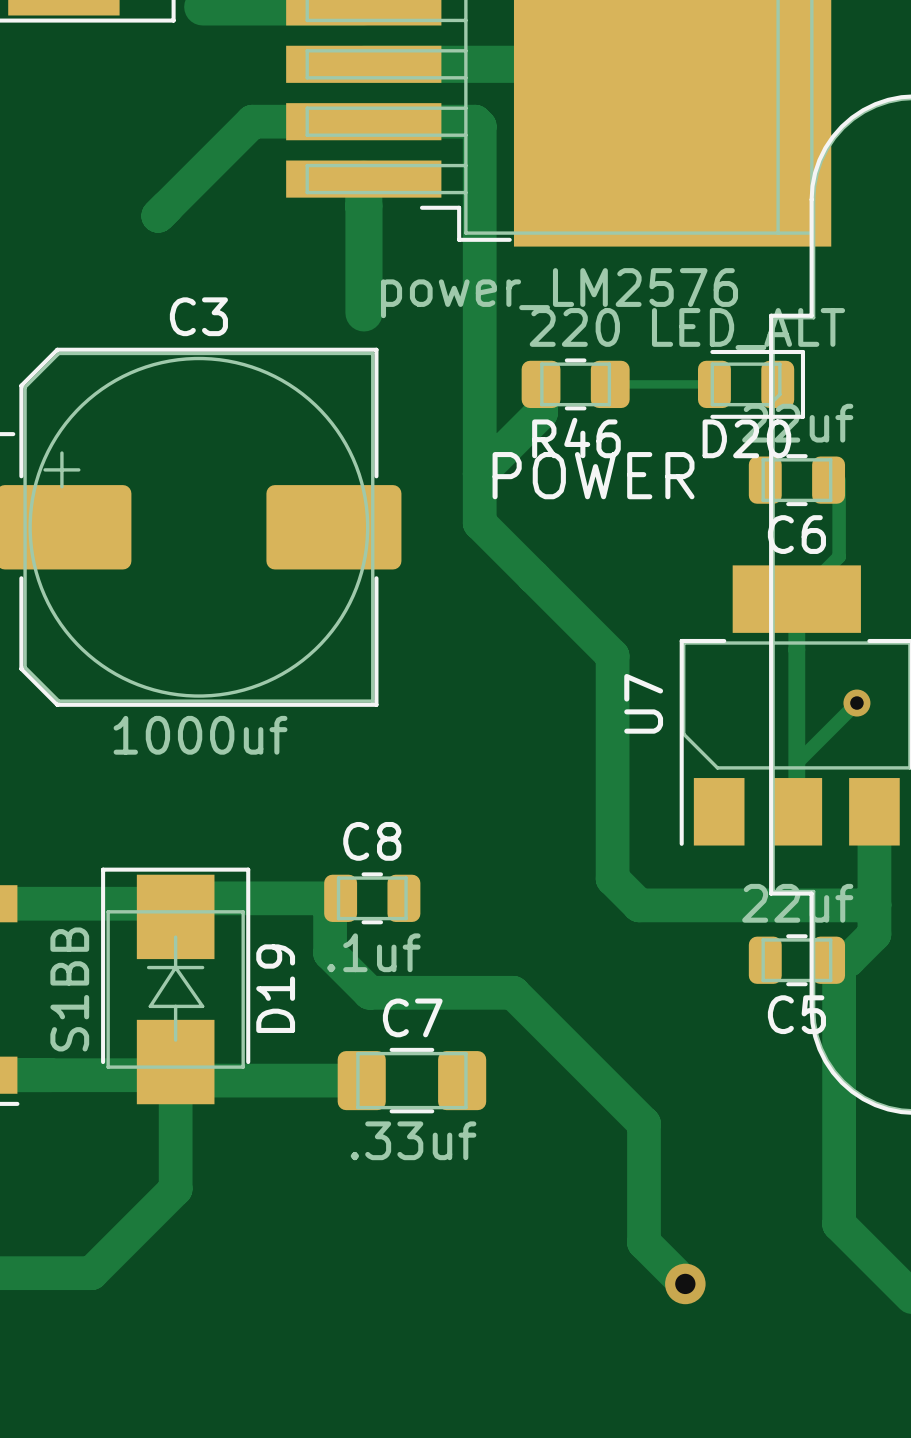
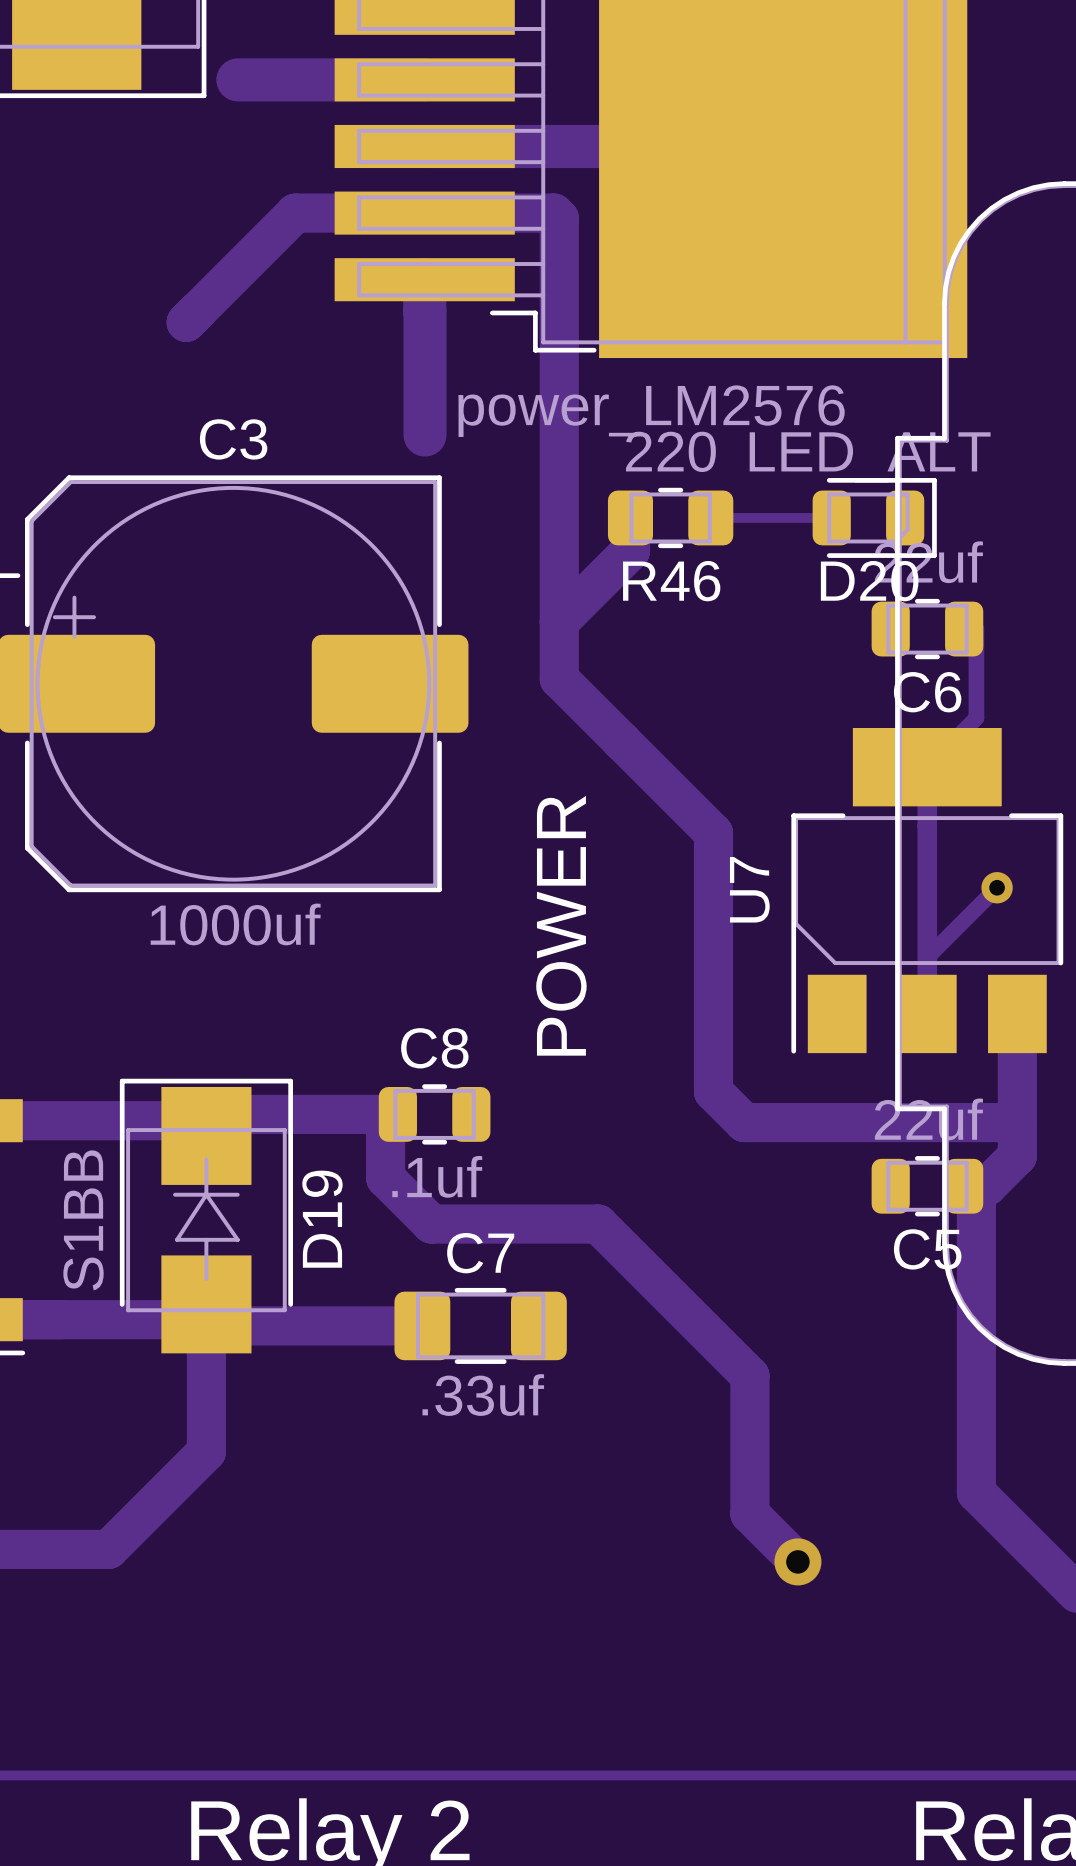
text rotation: 0° (593, 475) -> 90° counterclockwise (561, 925)
text position: POWER (593, 475) -> POWER (561, 925)

